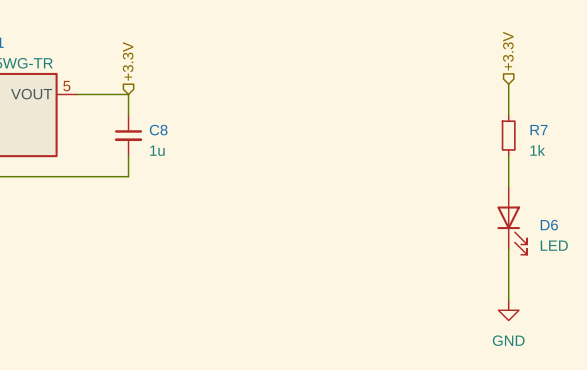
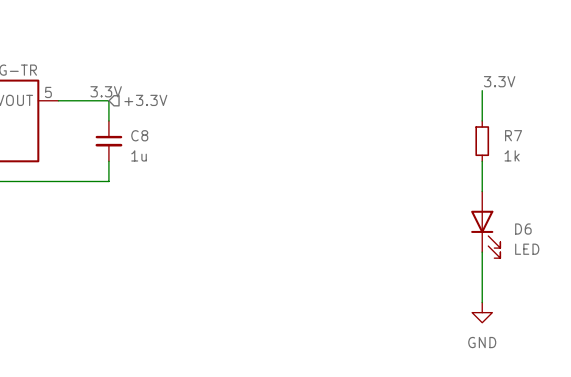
hierarchical label: +3.3V (508, 51) -> none
hierarchical label rotation: 0° (128, 61) -> 90° clockwise (145, 100)
hierarchical label position: +3.3V (128, 61) -> +3.3V (145, 100)
label: none -> 3.3V (499, 81)
label: none -> 3.3V (106, 91)

